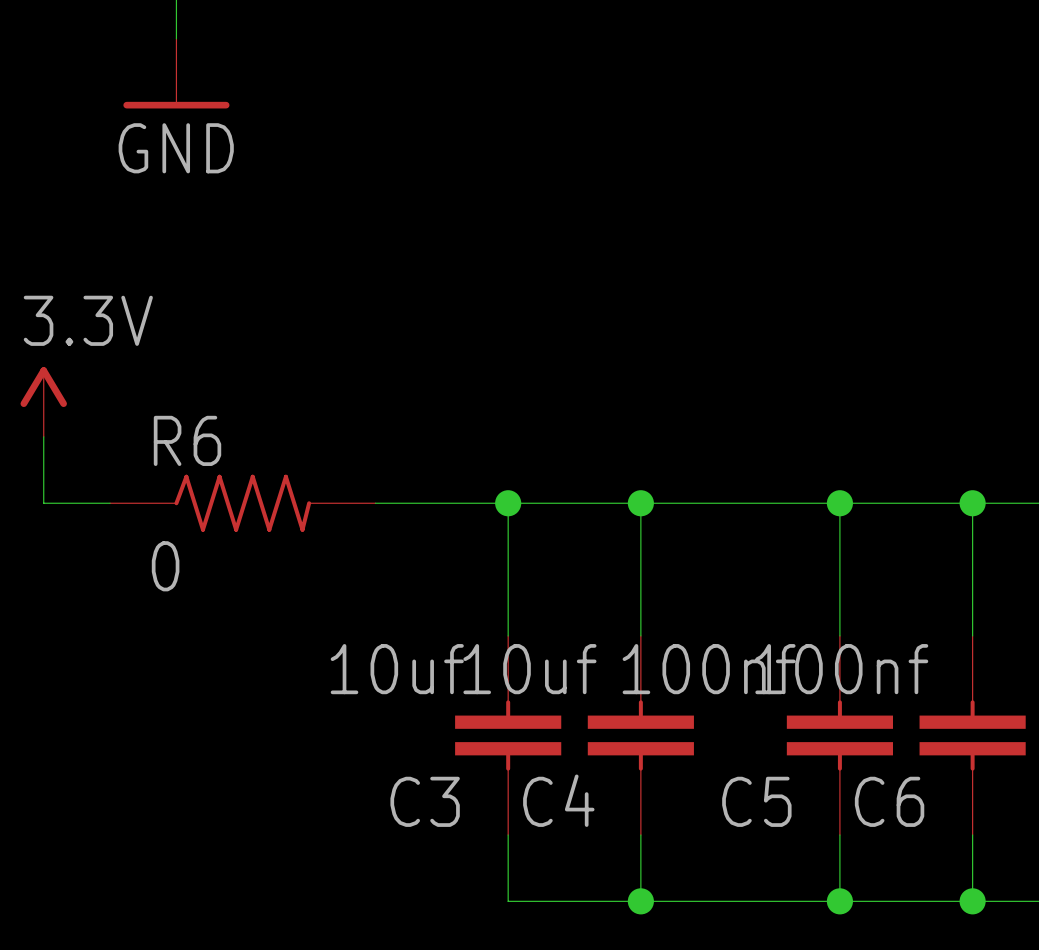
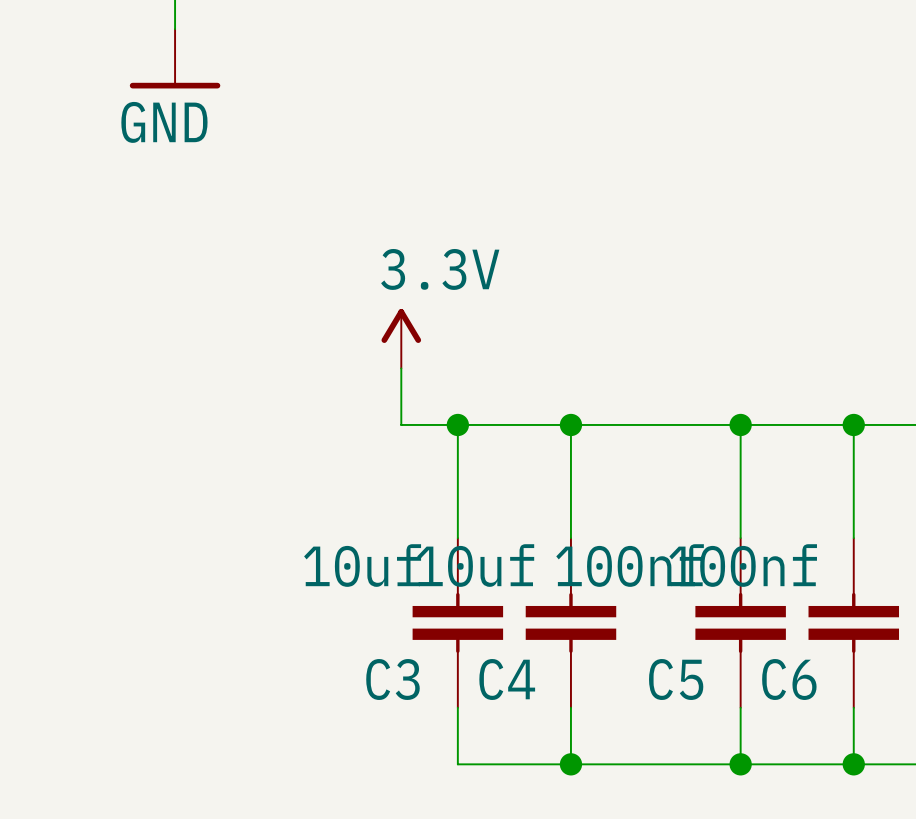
power symbol position: 3.3V (43, 402) -> 3.3V (401, 338)
wire: (43, 436) (43, 503) (110, 503) -> none
R6: 0 (242, 503) -> none
wire: (375, 503) (441, 503) -> (401, 368) (401, 424)

